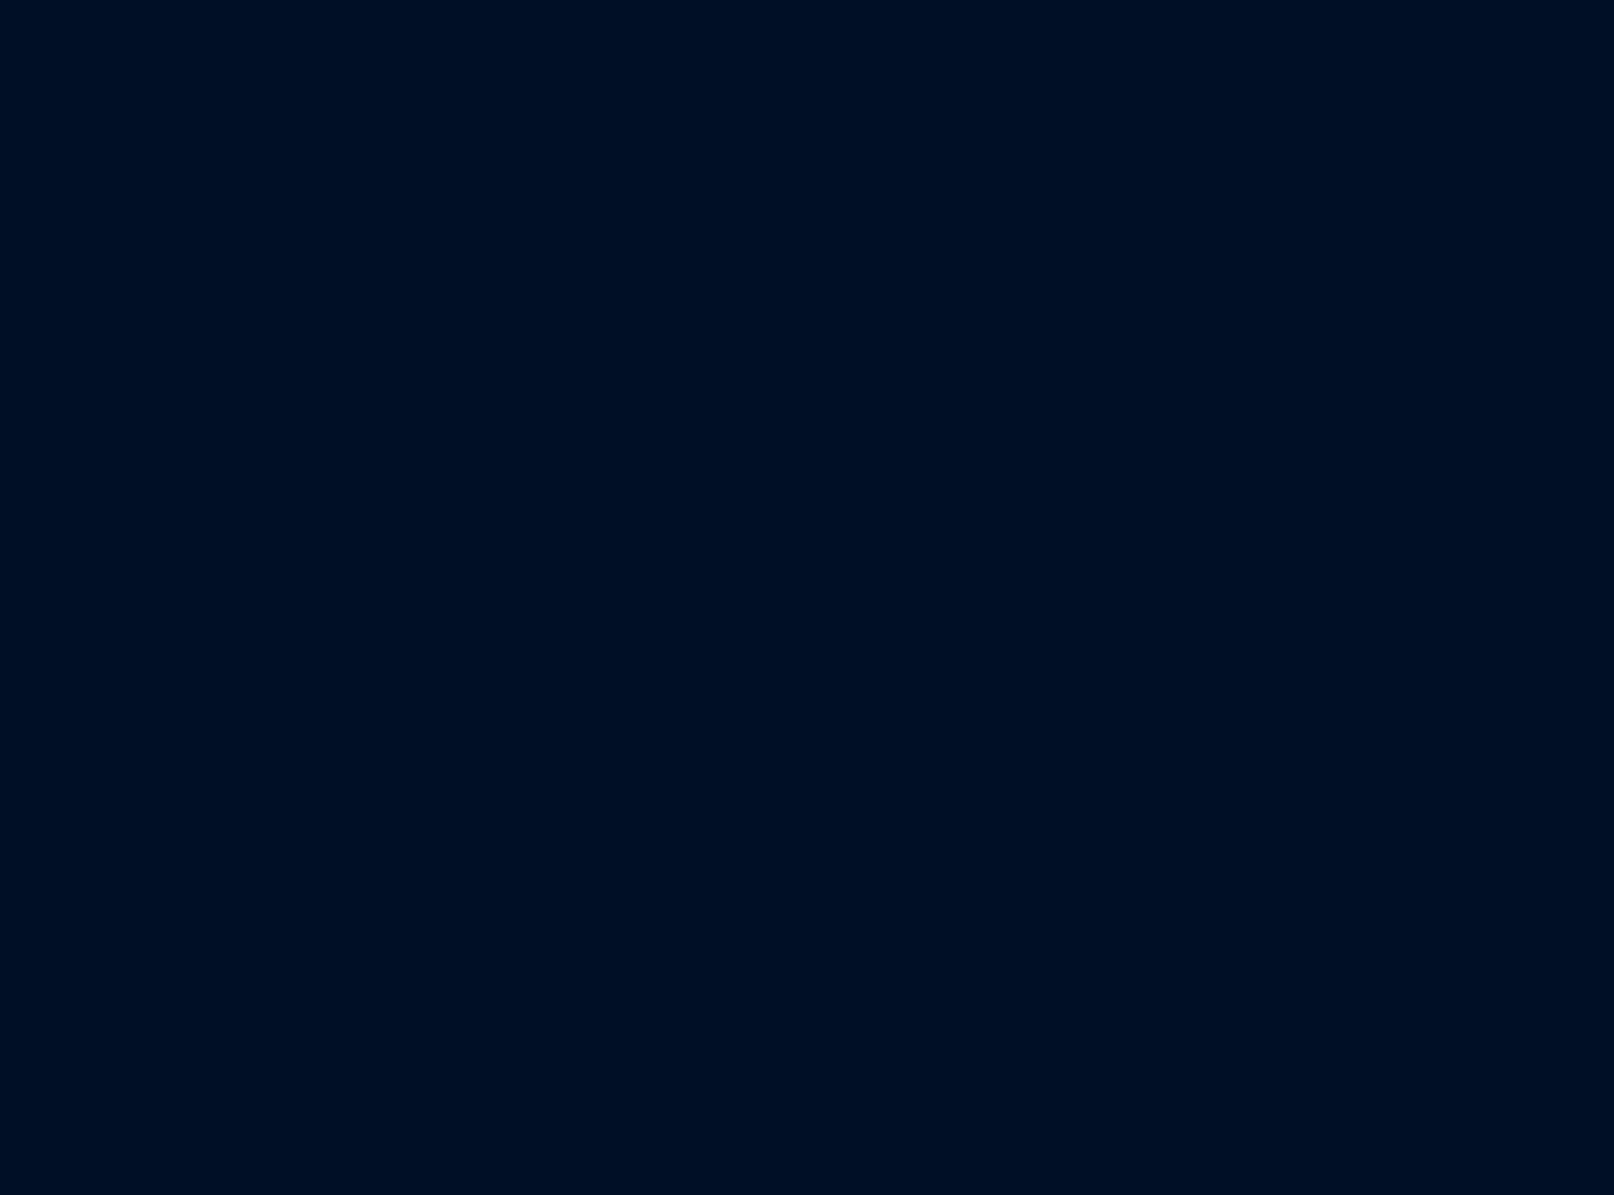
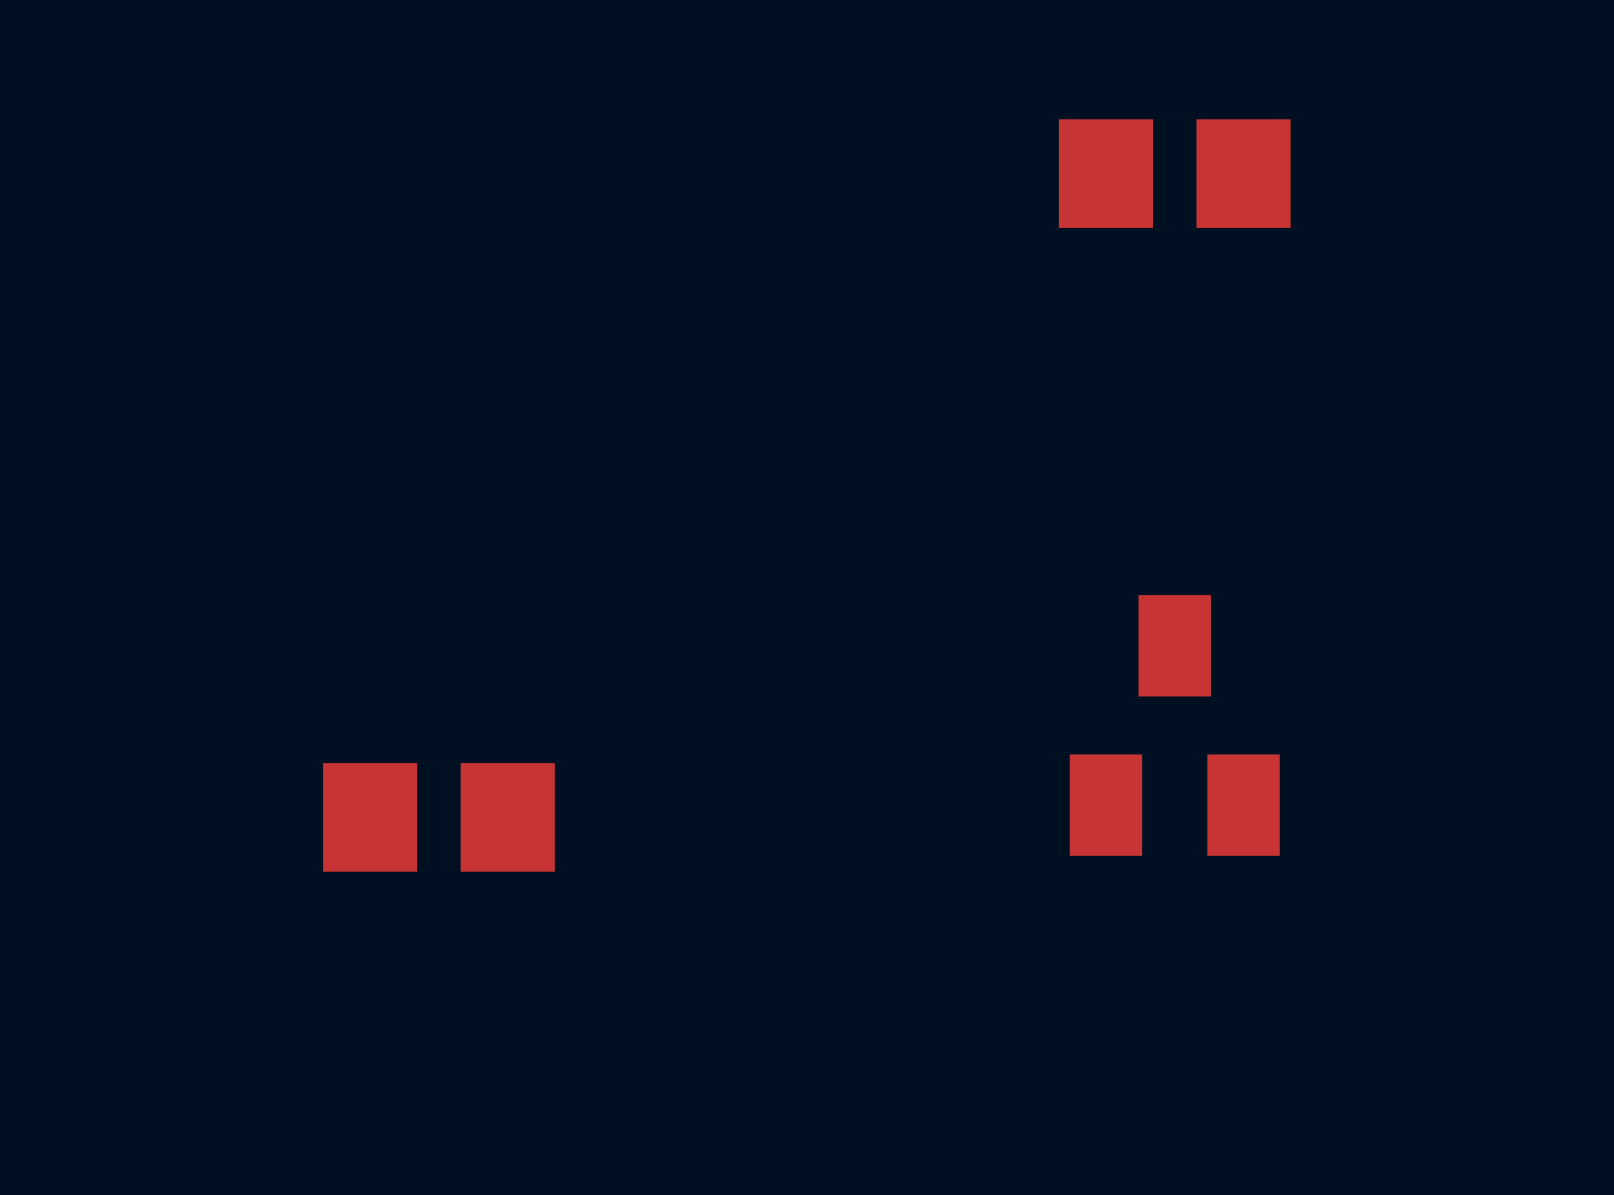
part: none -> (1174, 173)
part: none -> (1174, 725)
part: none -> (438, 817)

